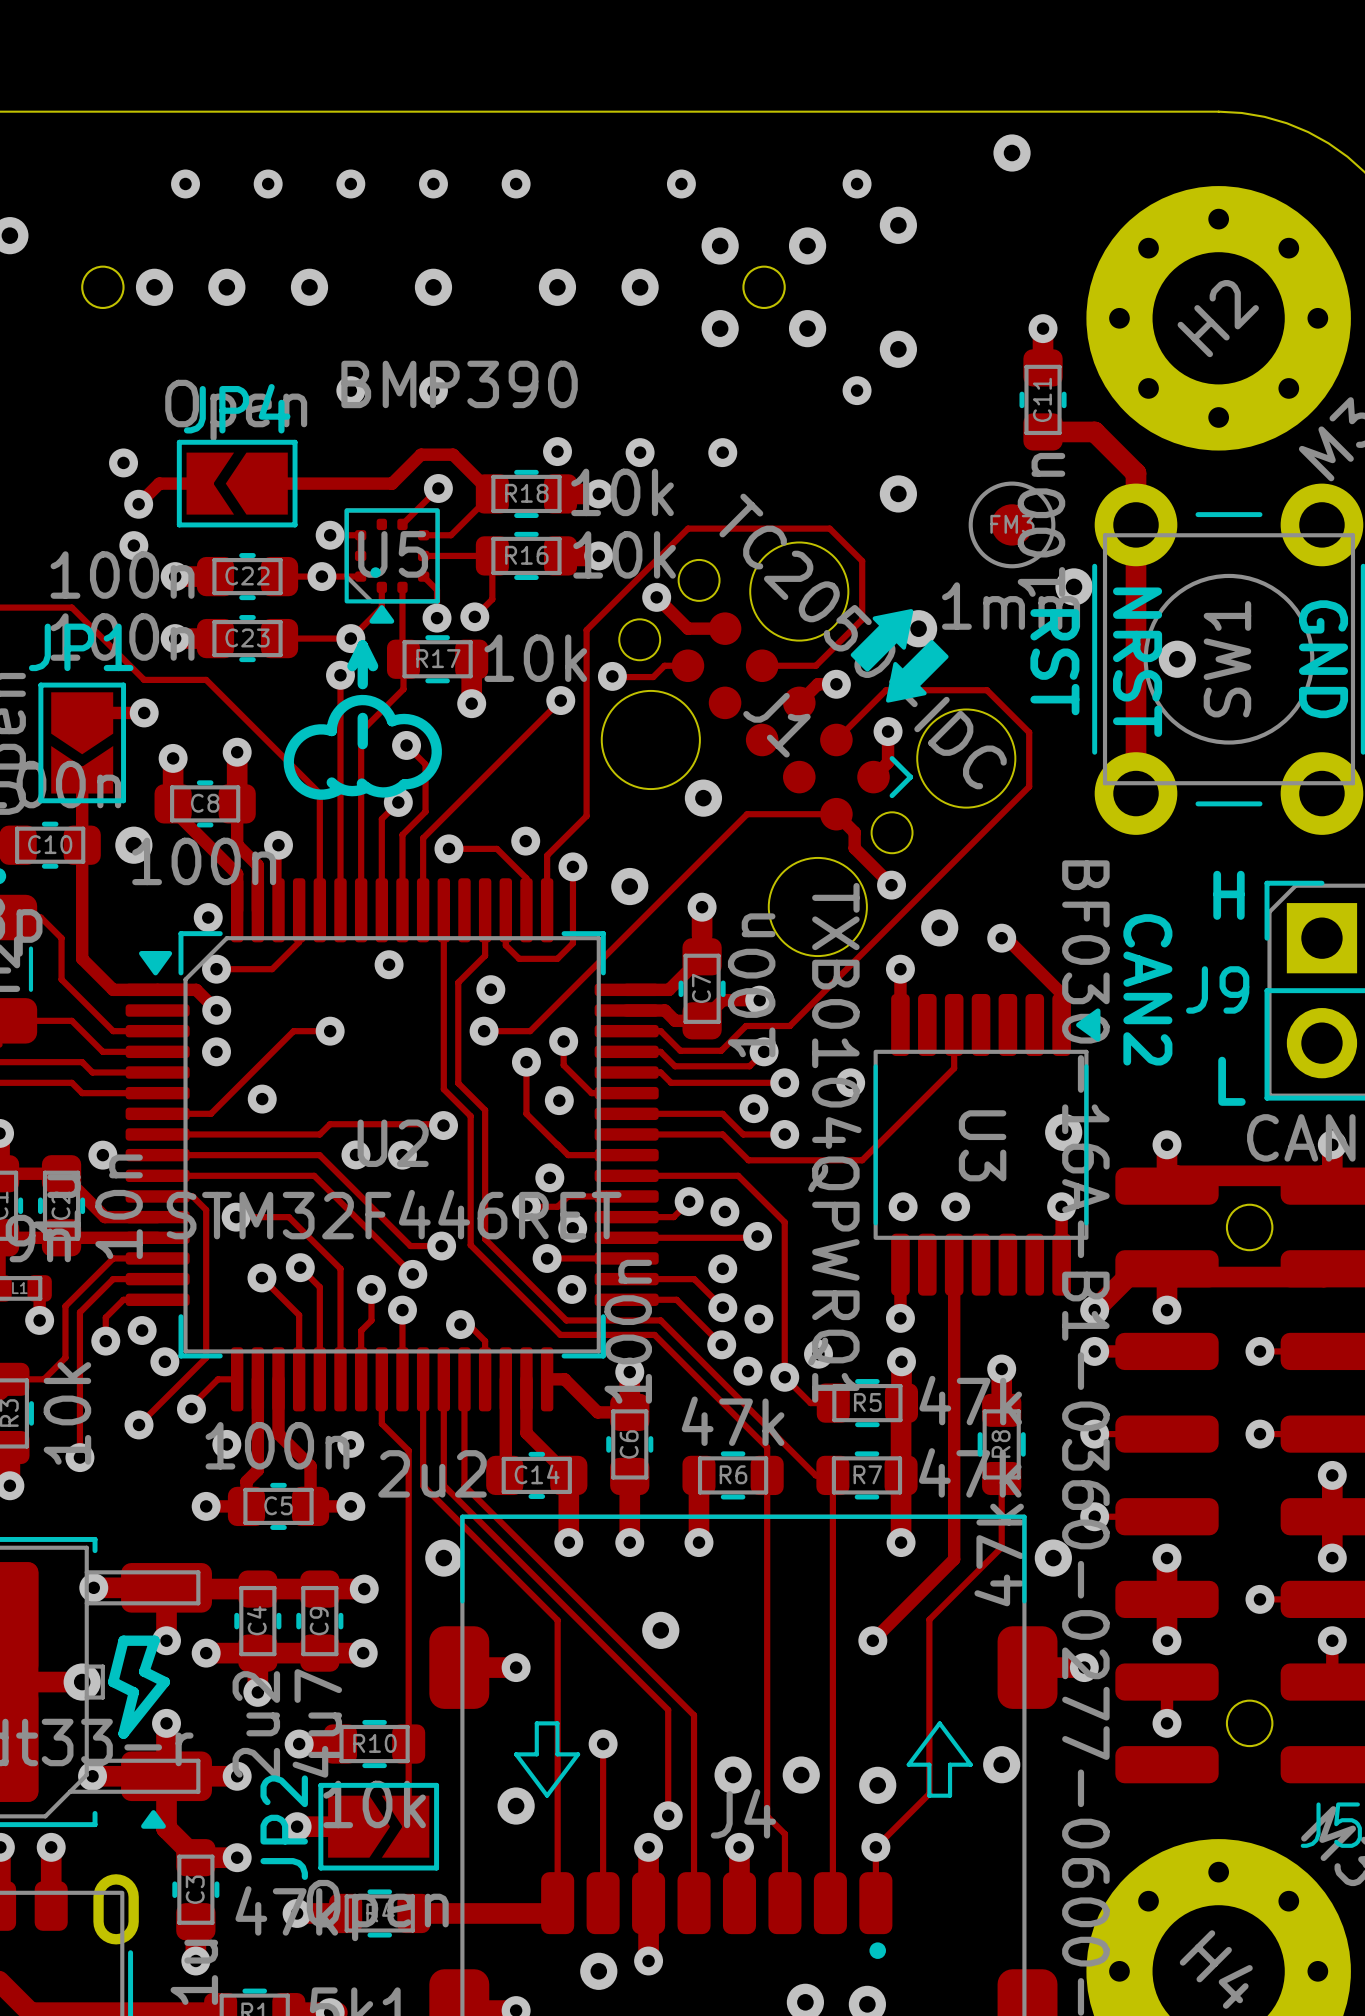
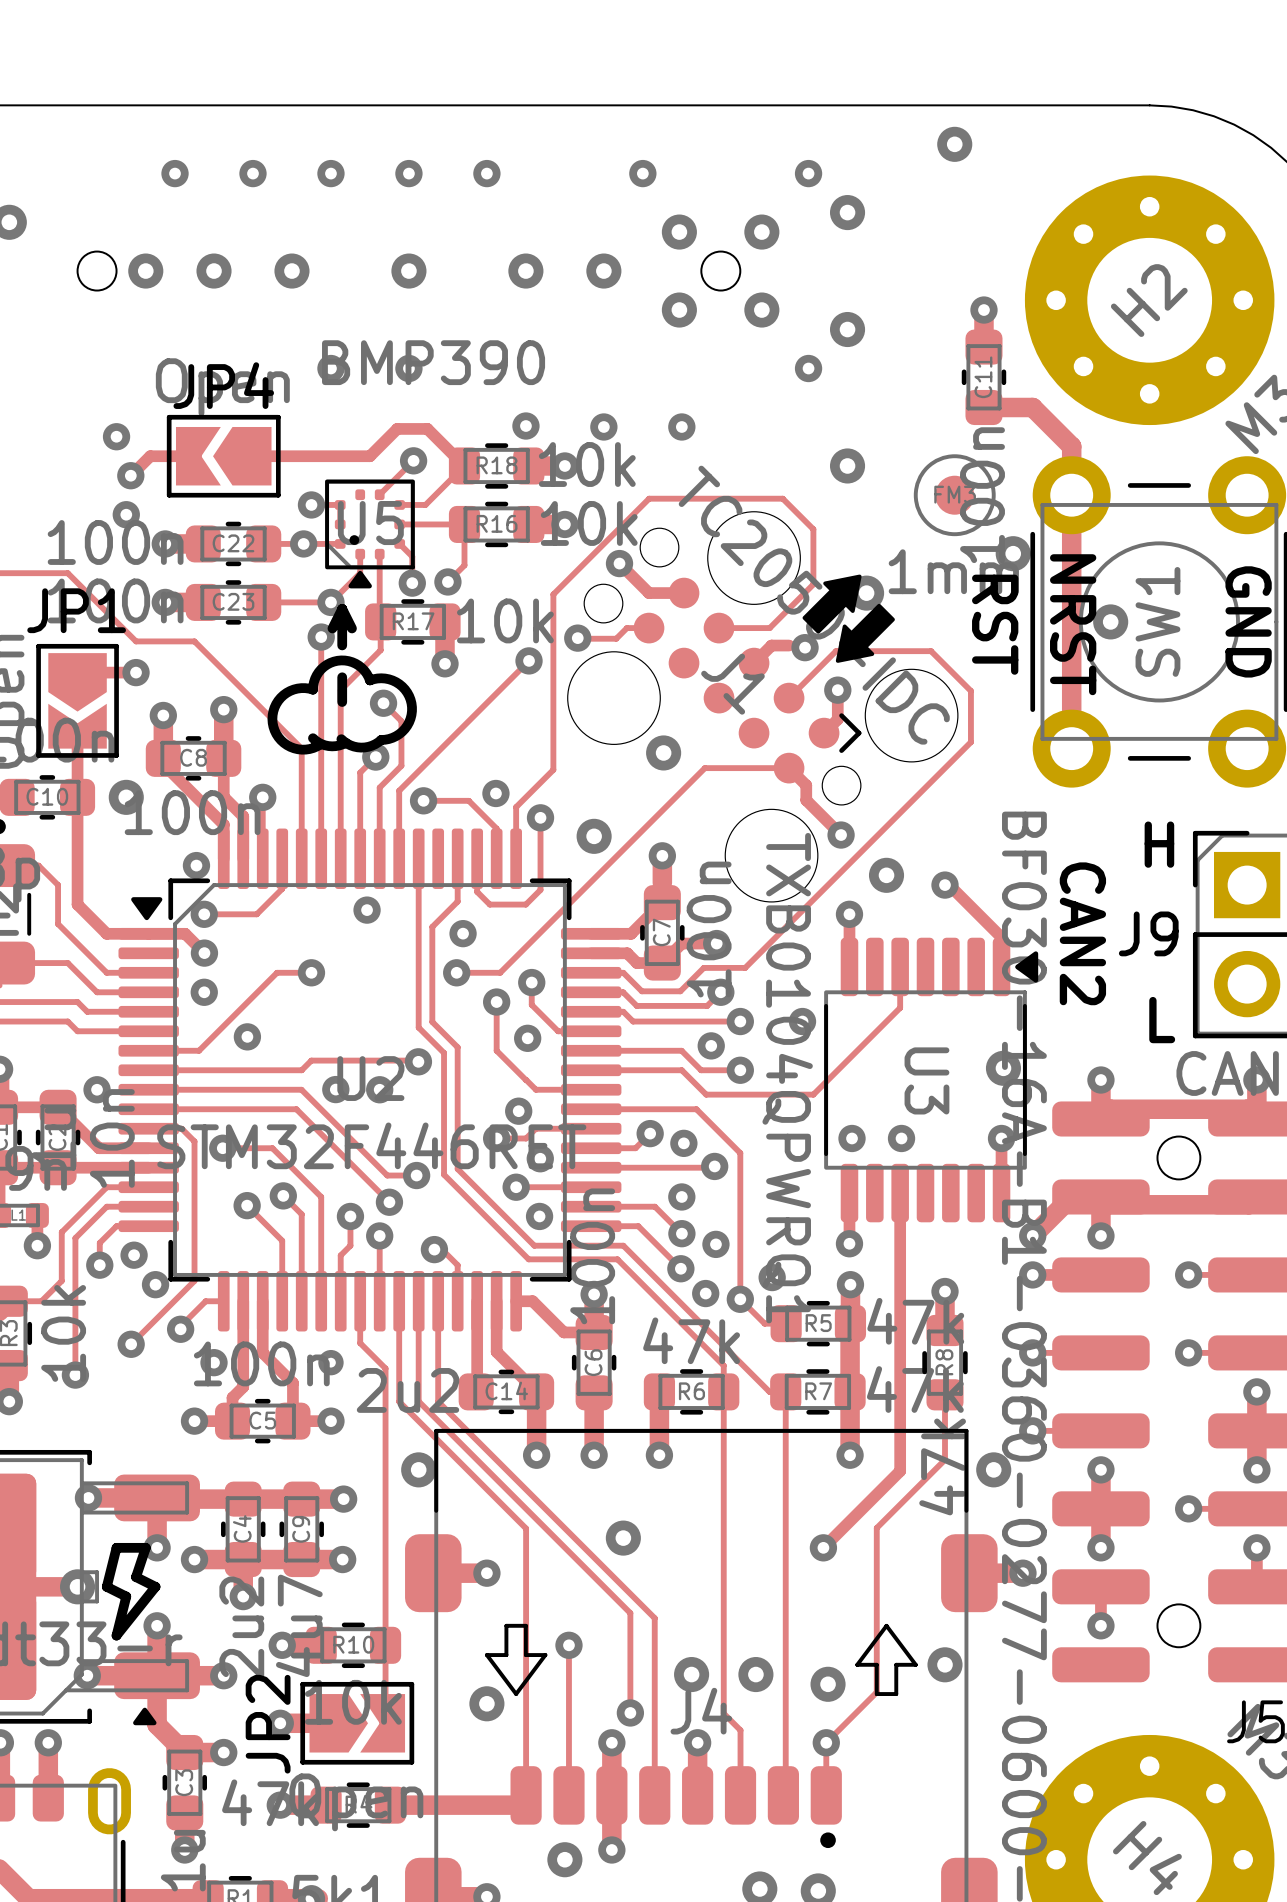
via position: (836, 684) -> (805, 647)

